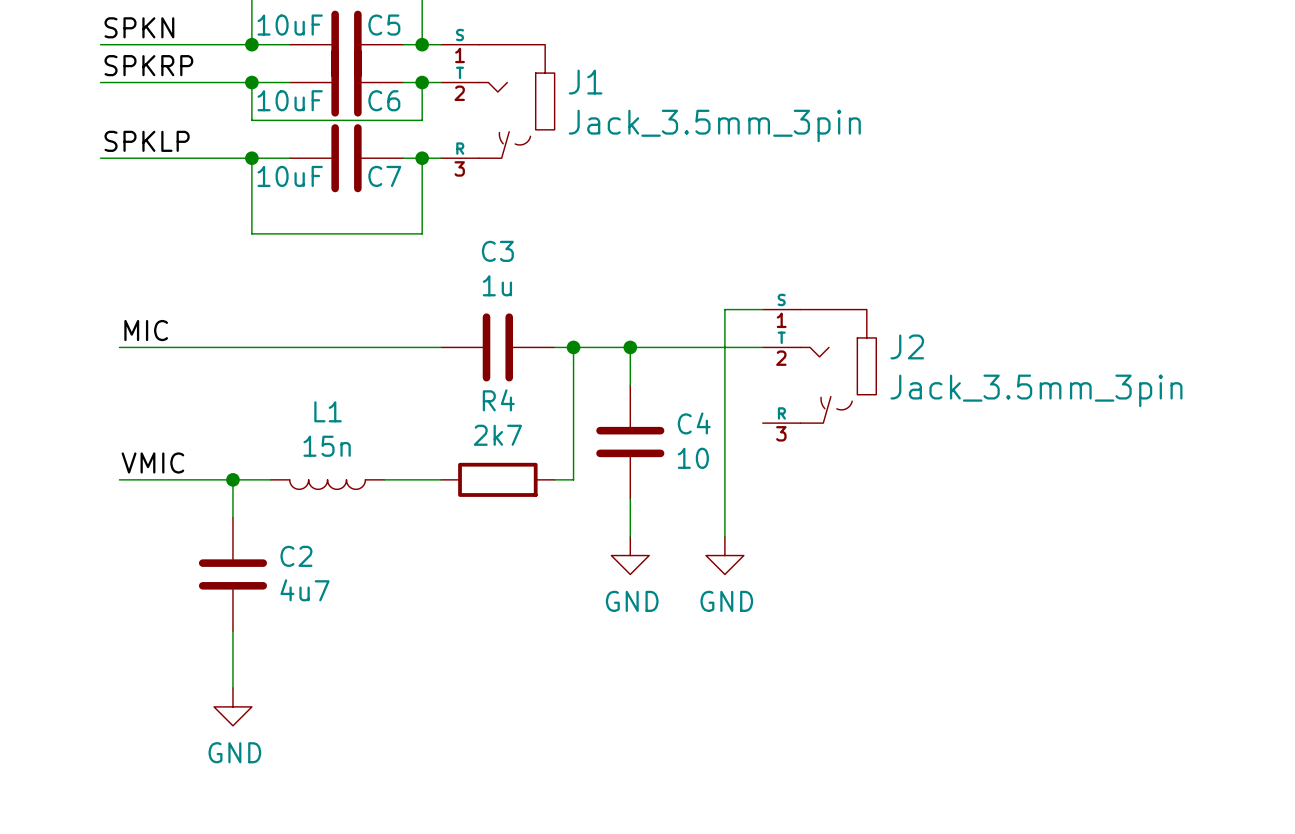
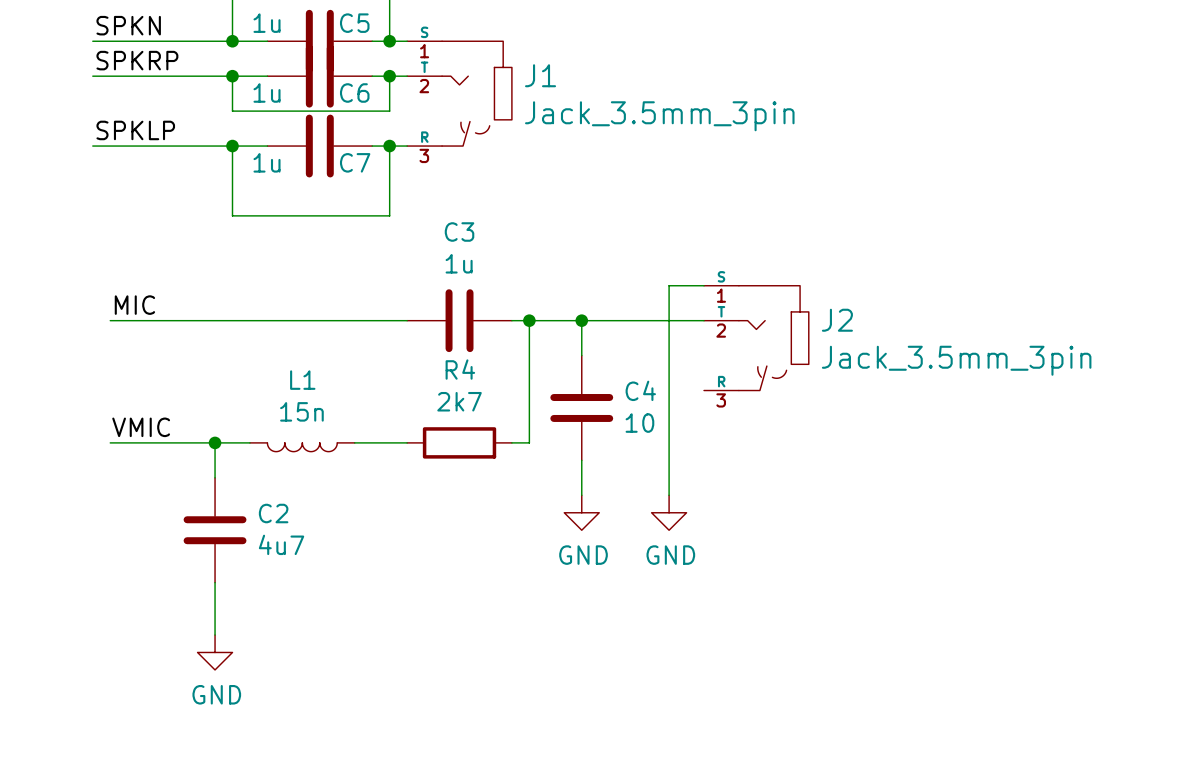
C5 value: 10uF (290, 25) -> 1u (267, 23)
C6 value: 10uF (290, 100) -> 1u (267, 92)
C7 value: 10uF (290, 176) -> 1u (267, 162)

